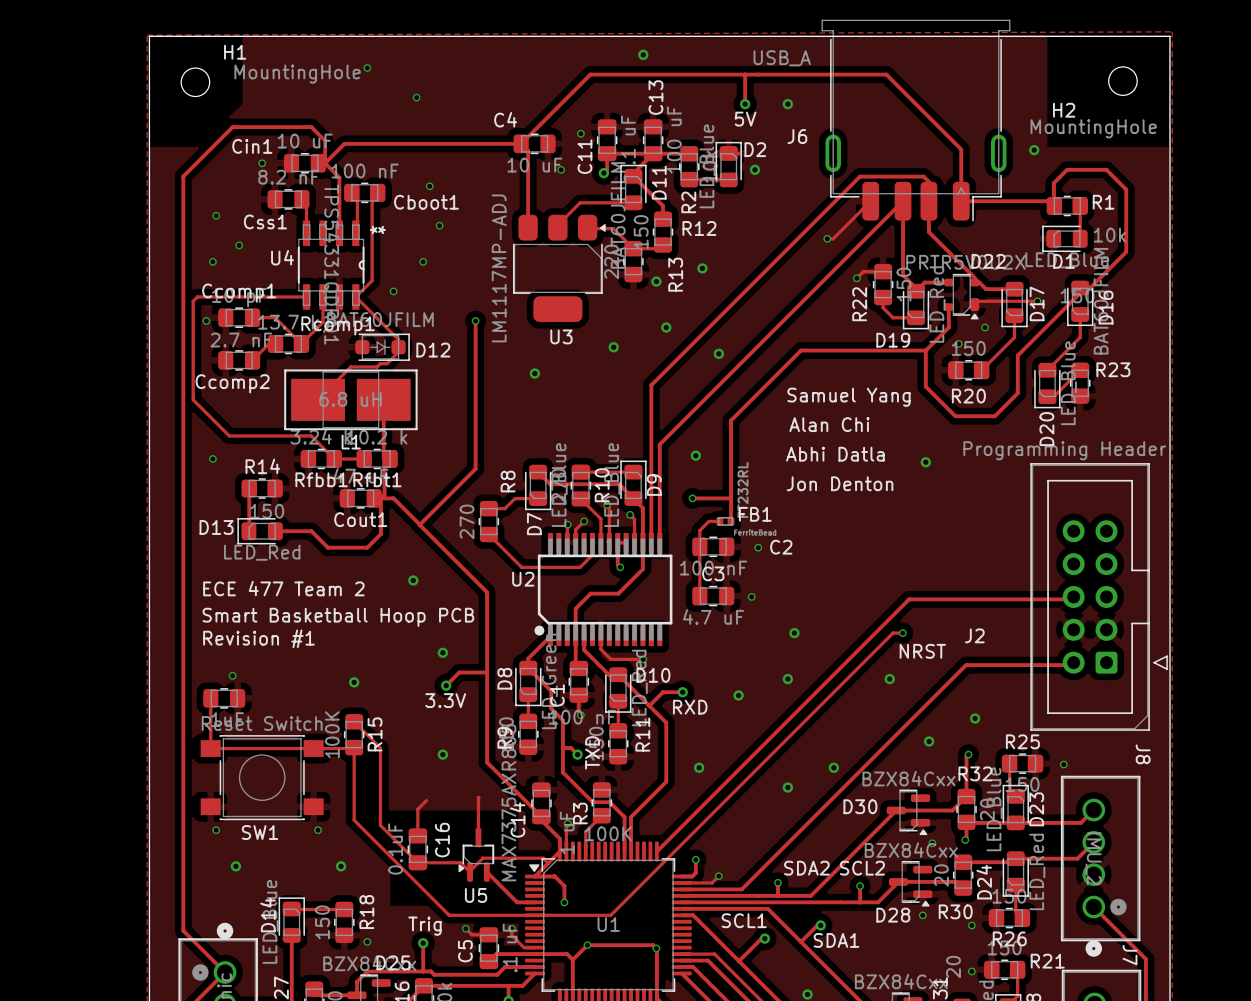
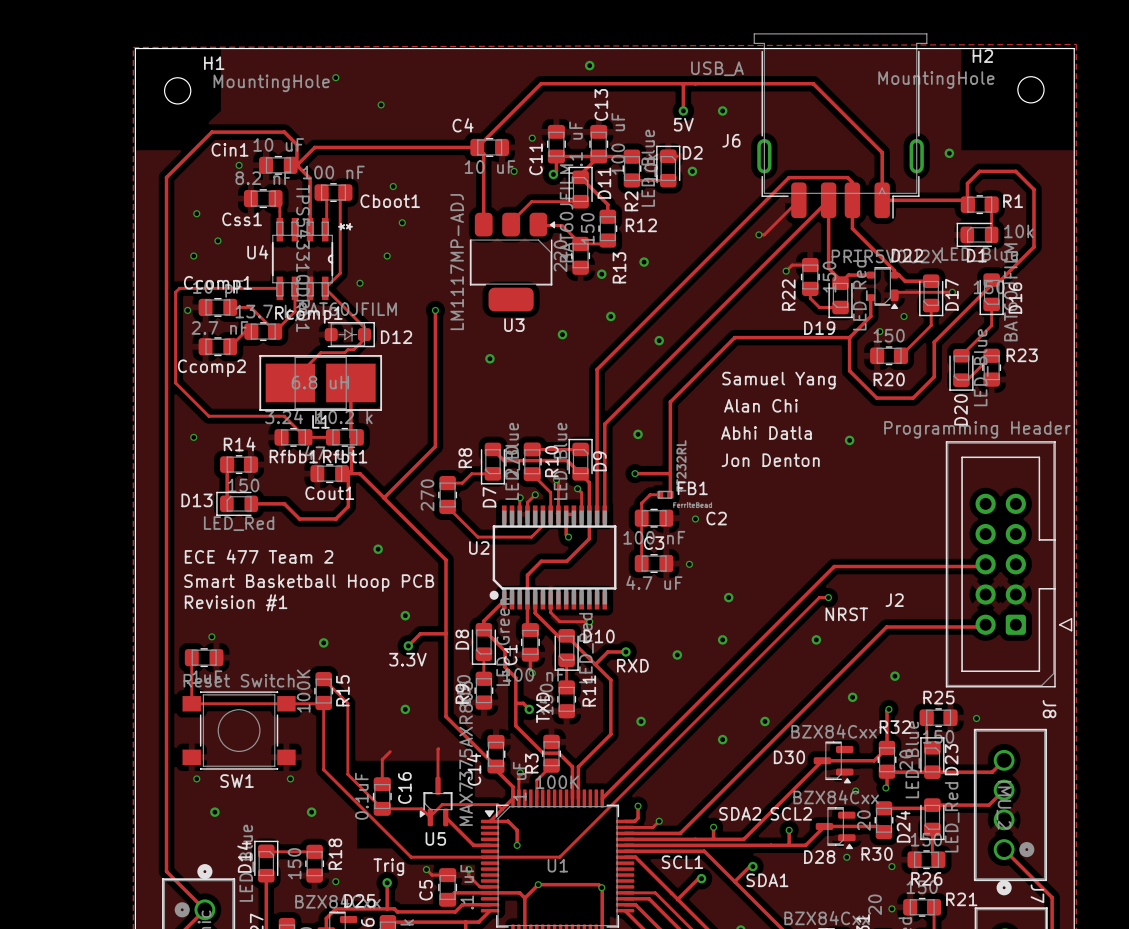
H2 name position: H2 (1064, 110) -> H2 (982, 56)
H2 value position: MountingHole (1093, 128) -> MountingHole (936, 80)

